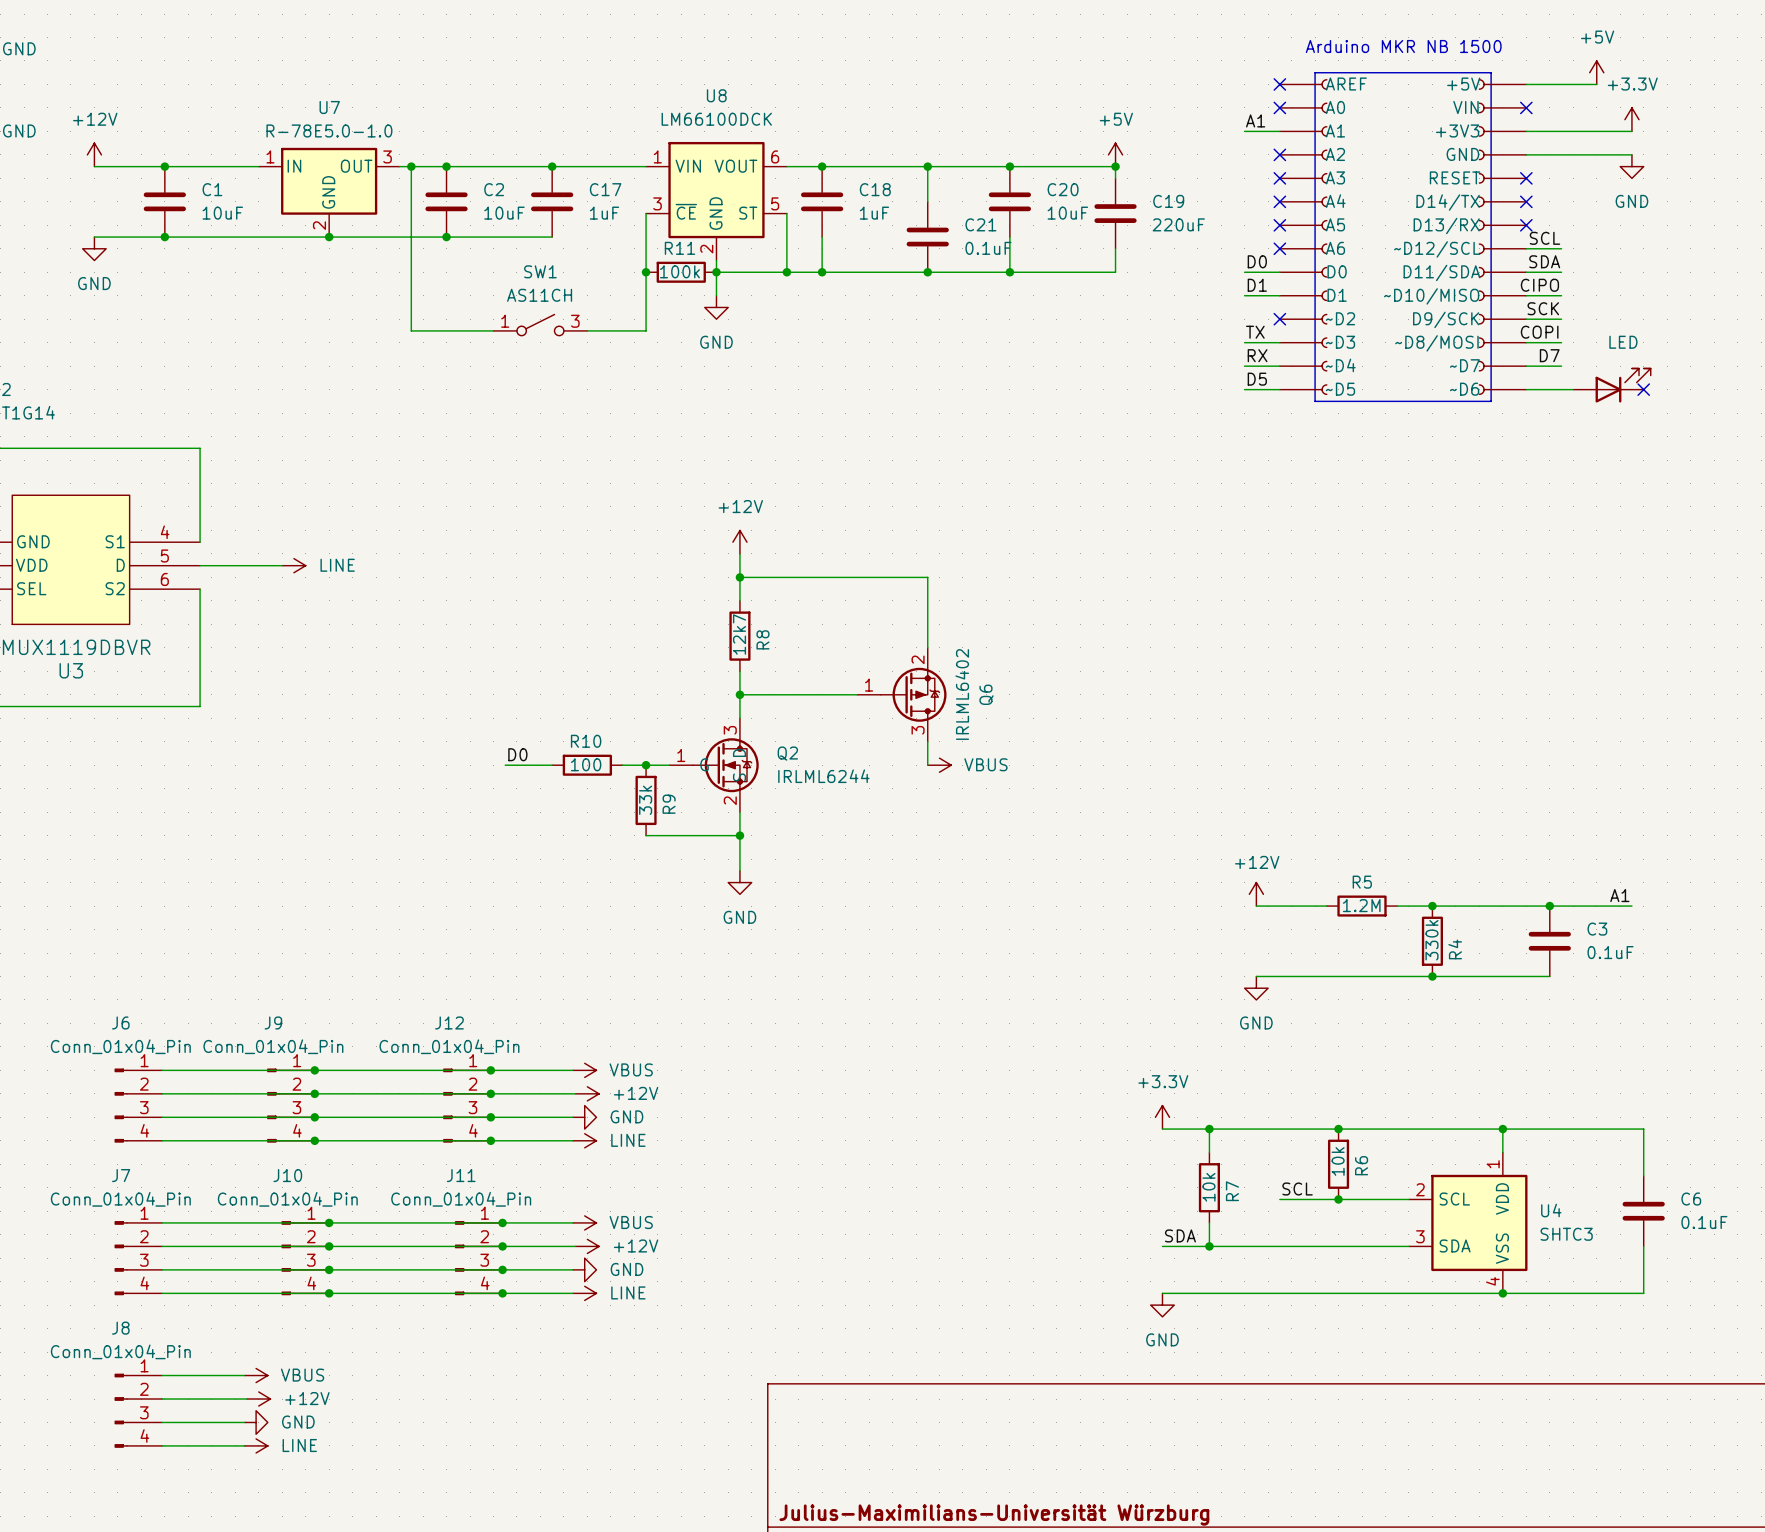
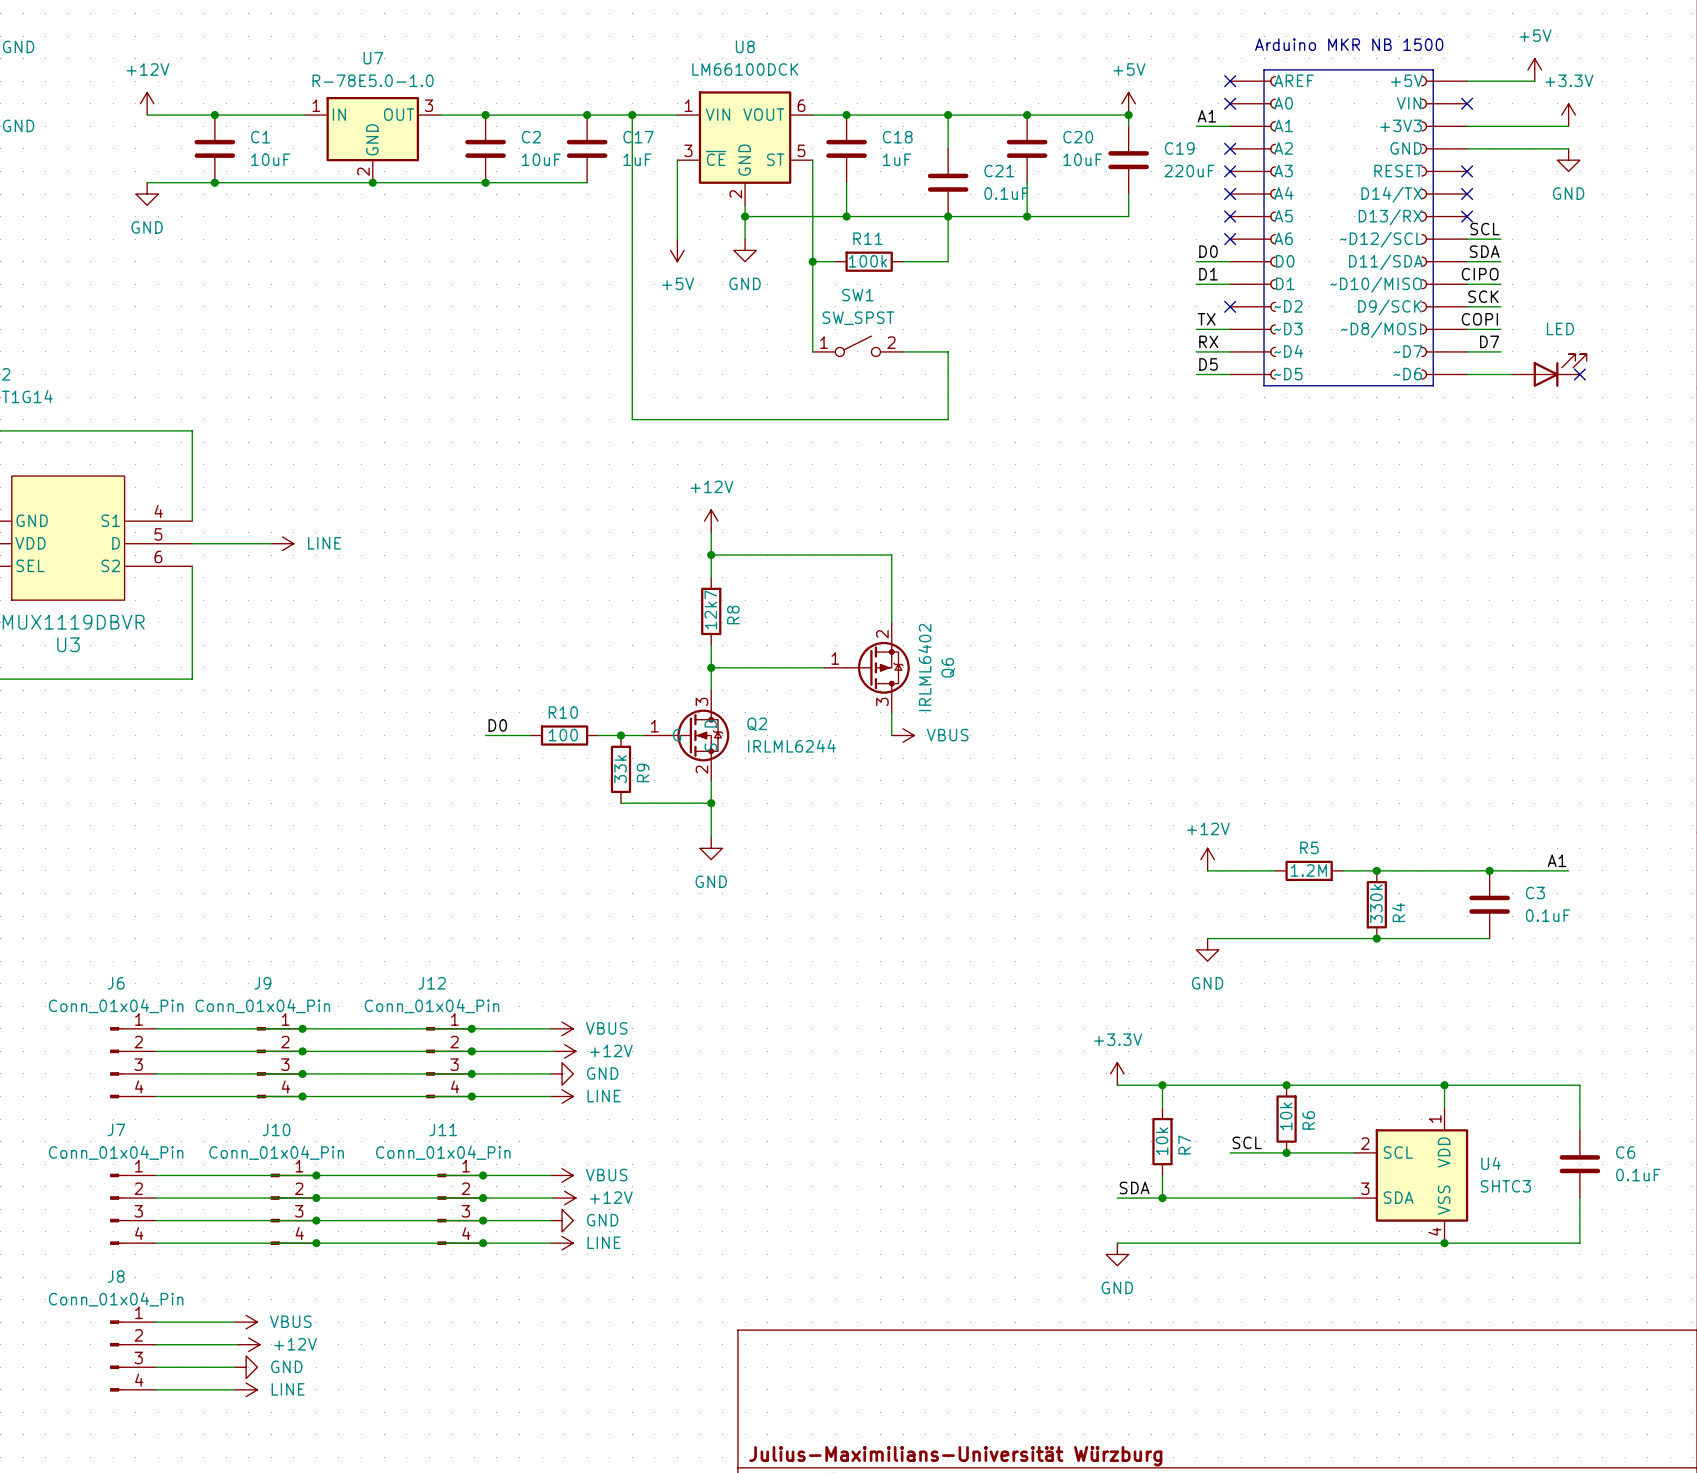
junction: none -> (214, 115)
junction: none -> (485, 115)
junction: none -> (587, 115)
wire: none -> (632, 115) (632, 419) (948, 419) (948, 351) (903, 351)
junction: none -> (632, 115)
junction: none -> (846, 115)
junction: none -> (948, 115)
junction: none -> (1027, 115)
junction: none -> (1128, 115)
power symbol position: +12V (94, 154) -> +12V (147, 103)
power symbol position: +5V (1115, 154) -> +5V (1128, 103)
wire: (94, 166) (258, 166) -> (147, 115) (305, 115)
junction: (164, 166) -> none
wire: (399, 166) (646, 166) -> (440, 115) (677, 115)
wire: (411, 166) (411, 330) (493, 330) -> none
junction: (411, 166) -> none
junction: (446, 166) -> none
junction: (552, 166) -> none
wire: (786, 166) (1115, 166) (1115, 178) -> (812, 115) (1128, 115) (1128, 126)
junction: (822, 166) -> none
wire: none -> (812, 160) (812, 351)
wire: (927, 166) (927, 201) -> (948, 115) (948, 148)
junction: (927, 166) -> none
junction: (1009, 166) -> none
junction: (1115, 166) -> none
junction: none -> (214, 182)
junction: none -> (372, 182)
junction: none -> (485, 182)
U7 position: (329, 192) -> (372, 139)
C1 position: (164, 201) -> (214, 148)
C2 position: (446, 201) -> (485, 148)
C17 position: (552, 201) -> (587, 148)
U8 position: (716, 201) -> (745, 148)
C18 position: (822, 201) -> (846, 148)
C20 position: (1009, 201) -> (1027, 148)
wire: none -> (1128, 194) (1128, 216) (745, 216)
wire: (646, 213) (646, 330) (587, 330) -> none
wire: (786, 213) (786, 272) -> none
C19 position: (1115, 213) -> (1128, 160)
junction: none -> (745, 216)
junction: none -> (846, 216)
junction: none -> (948, 216)
junction: none -> (1027, 216)
wire: (94, 237) (552, 237) -> (147, 182) (587, 182)
junction: (164, 237) -> none
junction: (329, 237) -> none
junction: (446, 237) -> none
wire: (822, 237) (822, 272) -> (846, 182) (846, 216)
C21 position: (927, 237) -> (948, 182)
wire: (1009, 237) (1009, 272) -> (1027, 182) (1027, 216)
power symbol position: GND (94, 248) -> GND (147, 194)
wire: (1115, 248) (1115, 272) (986, 272) -> (948, 216) (948, 261)
power symbol: none -> +5V (677, 250)
wire: (716, 260) (716, 295) -> (745, 205) (745, 239)
junction: (646, 272) -> none
R11 position: (681, 272) -> (869, 261)
wire: (716, 272) (845, 272) -> none
junction: (716, 272) -> none
junction: (786, 272) -> none
junction position: (822, 272) -> (812, 261)
junction: (927, 272) -> none
junction: (1009, 272) -> none
SW1 value: AS11CH (539, 295) -> SW_SPST (858, 318)
power symbol position: GND (716, 307) -> GND (745, 250)
SW1 pin number: 3 (575, 321) -> 2 (891, 342)
SW1 position: (540, 325) -> (857, 346)

